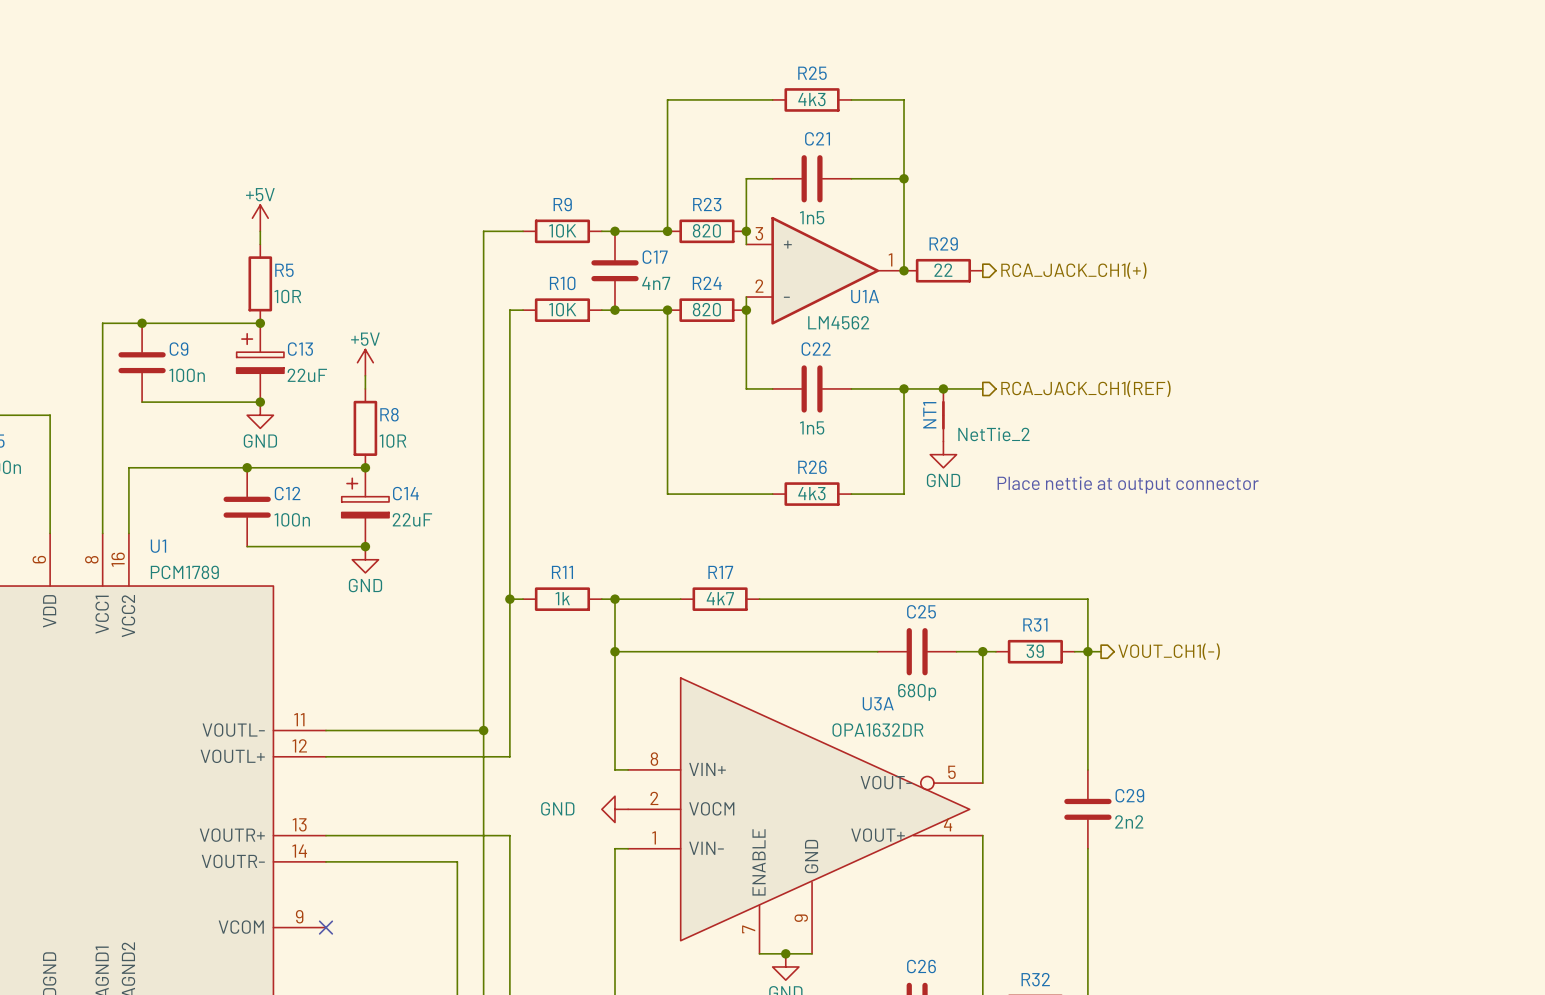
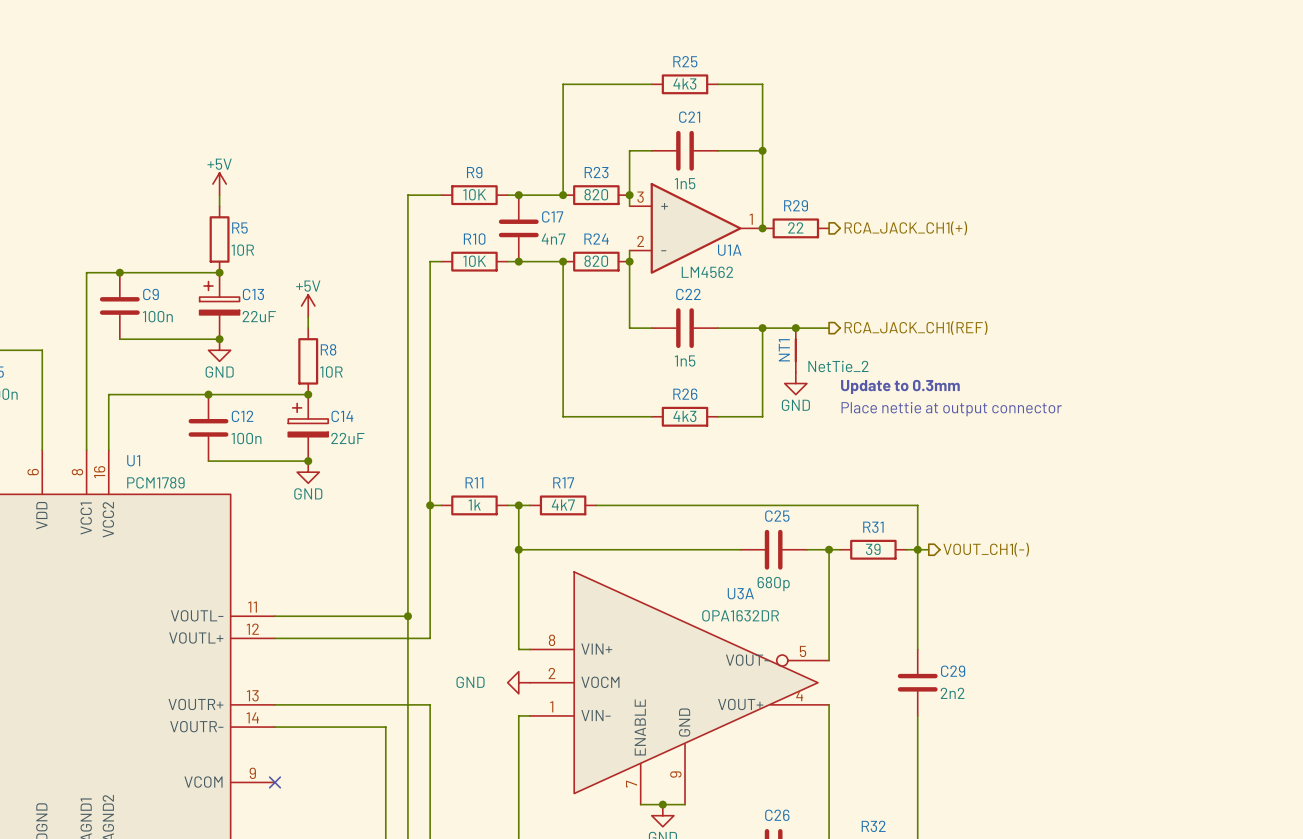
text: none -> Update to 0.3mm (900, 386)
wire: (628, 599) (680, 599) -> (596, 505) (640, 505)
R17 position: (720, 599) -> (563, 505)

